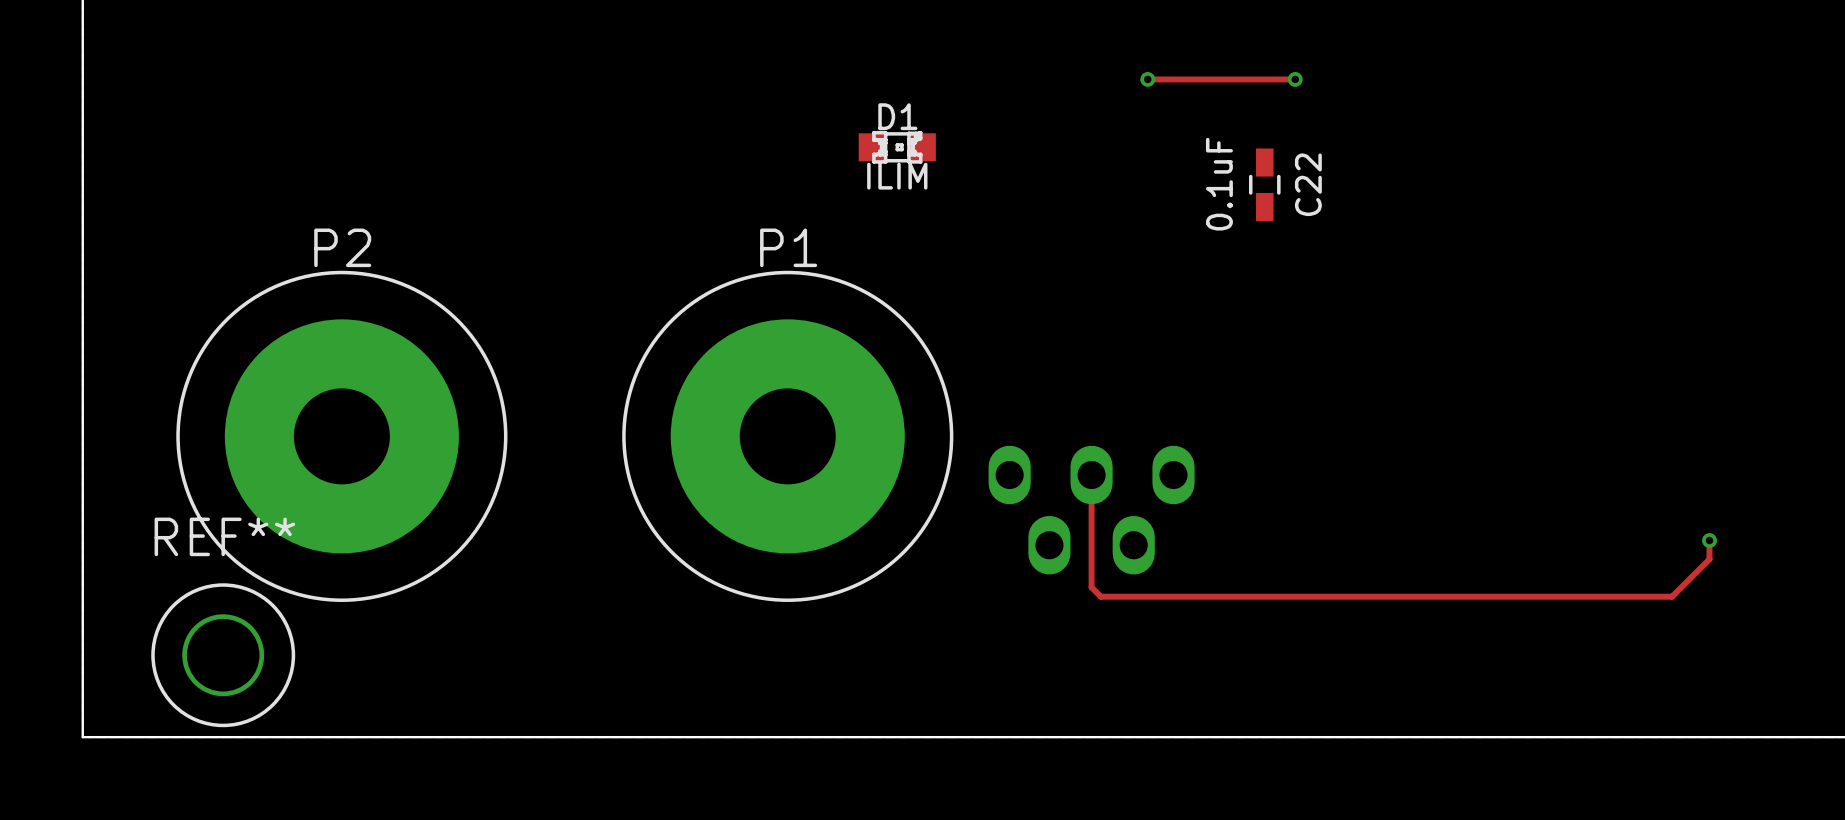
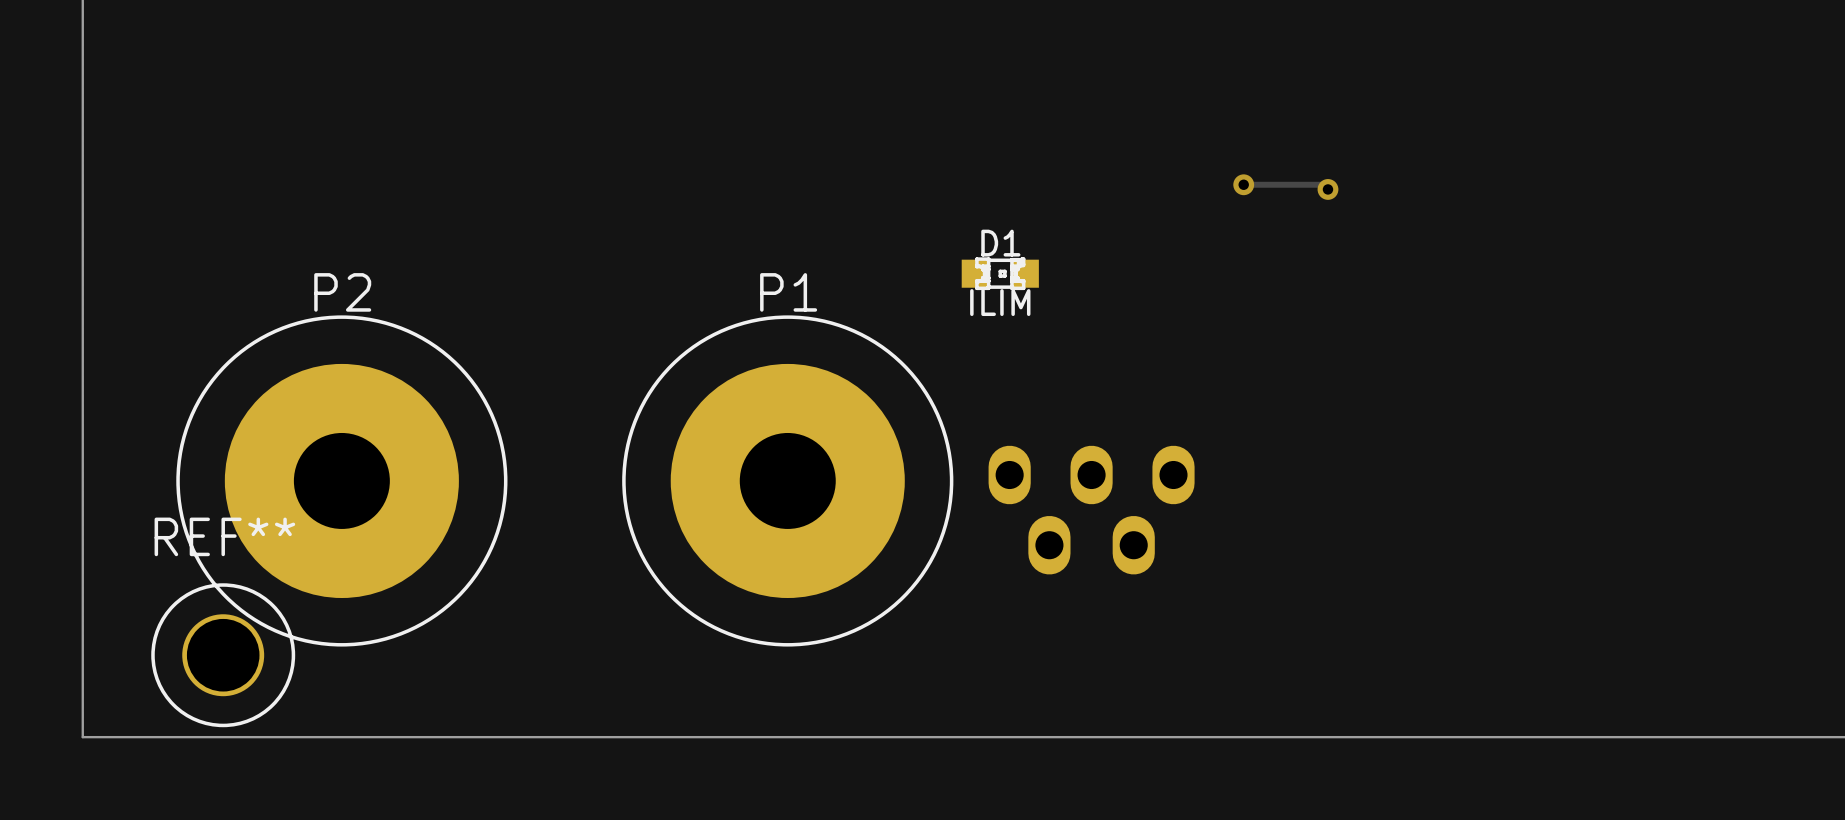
track: (1147, 79) (1295, 79) -> none
via: (1147, 79) -> none
via: (1295, 79) -> none
D1 position: (897, 147) -> (1000, 273)
track: none -> (1243, 184) (1323, 184) (1327, 189)
via: none -> (1243, 184)
C22: 0.1uF (1264, 184) -> none
via: none -> (1327, 189)
P2 position: (341, 436) -> (341, 480)
P1 position: (787, 436) -> (787, 480)
track: (1091, 475) (1091, 587) (1100, 596) (1672, 596) (1709, 559) (1709, 540) -> none
via: (1709, 540) -> none

